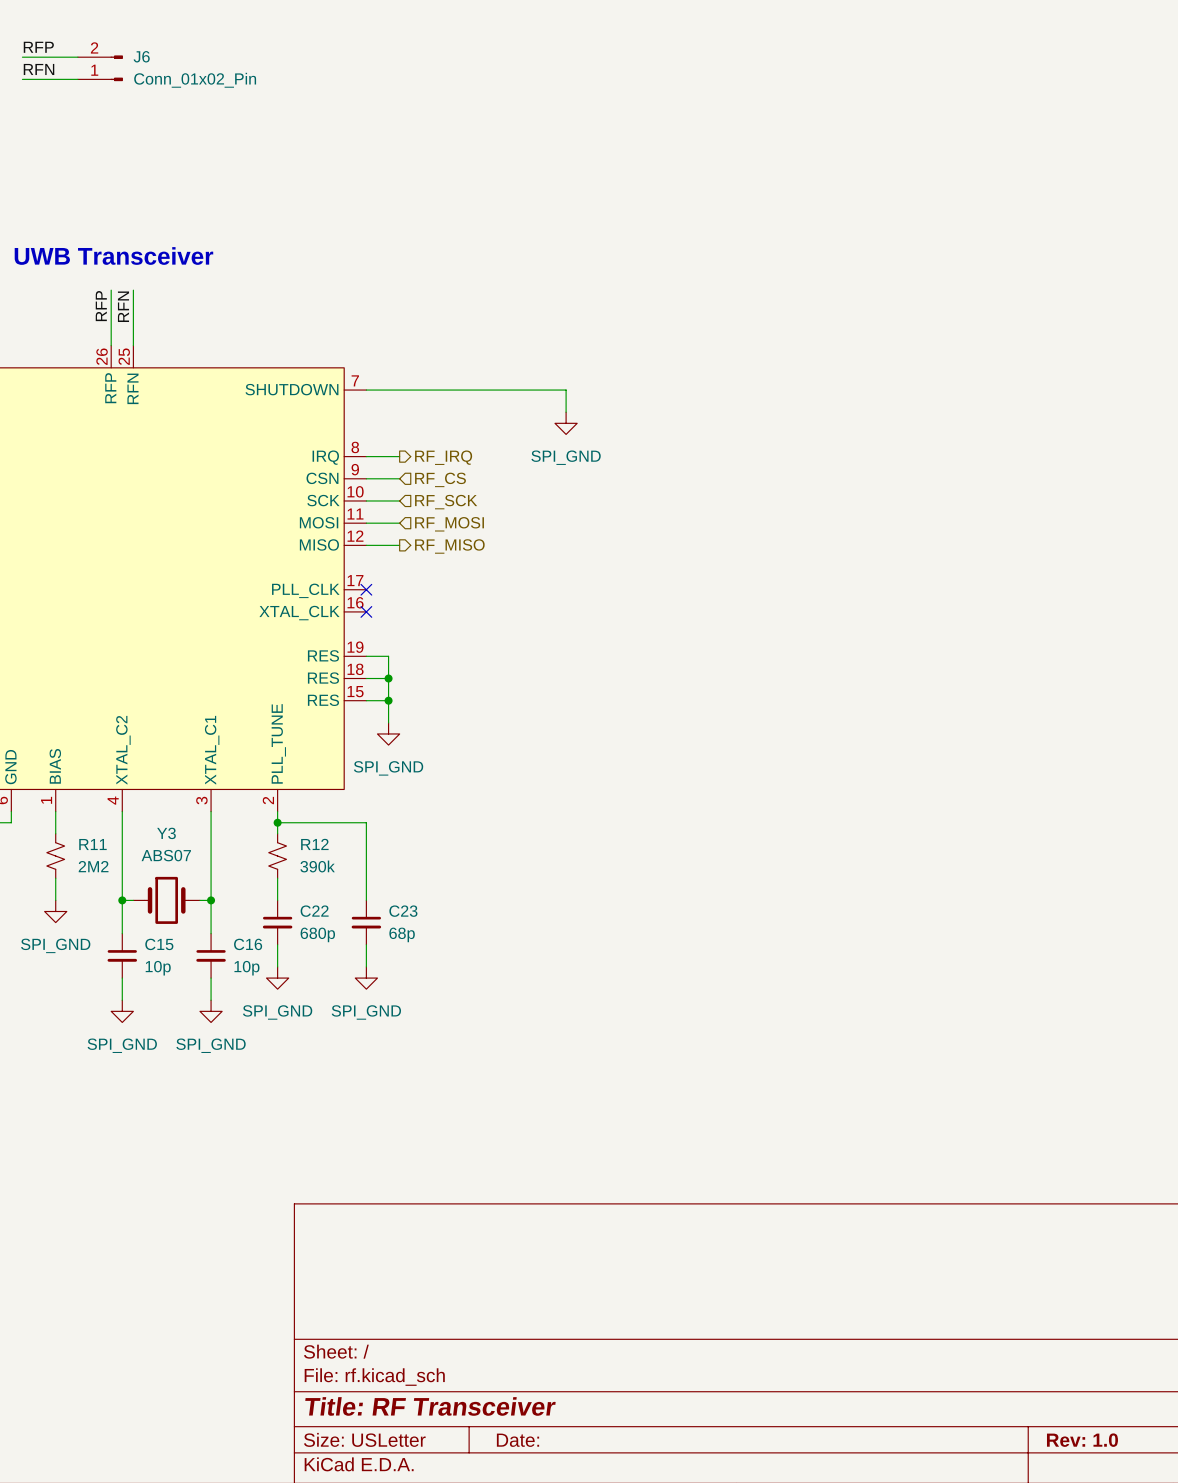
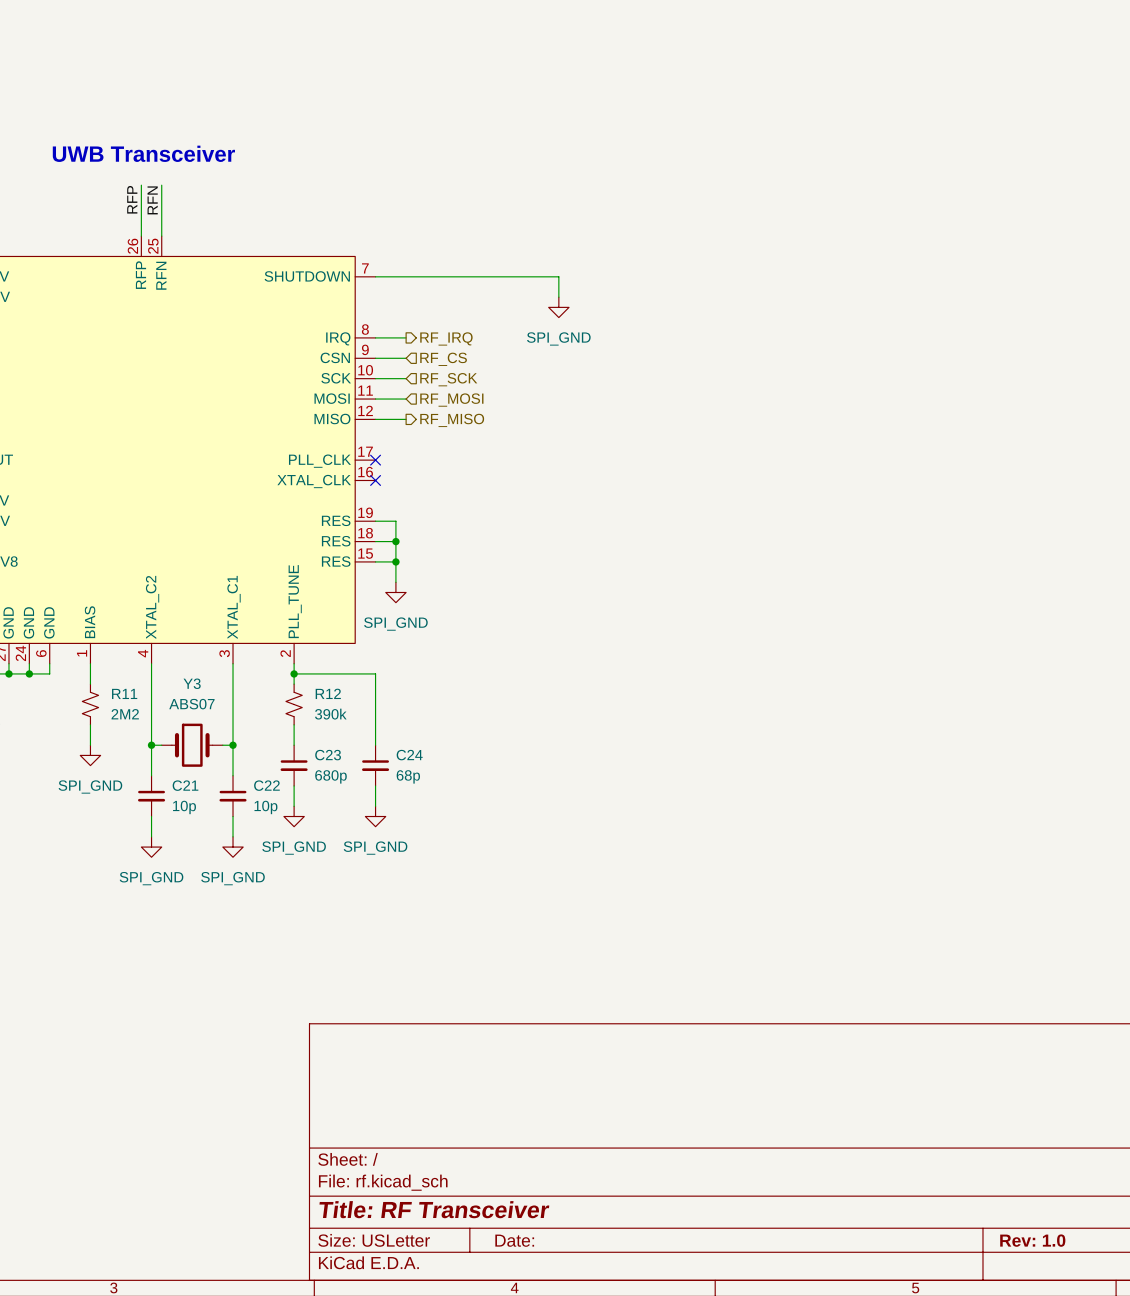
C22 name: C22 (314, 911) -> C23 (328, 755)
C23 name: C23 (403, 911) -> C24 (409, 755)
C15 name: C15 (159, 944) -> C21 (185, 785)
C16 name: C16 (248, 944) -> C22 (266, 785)

